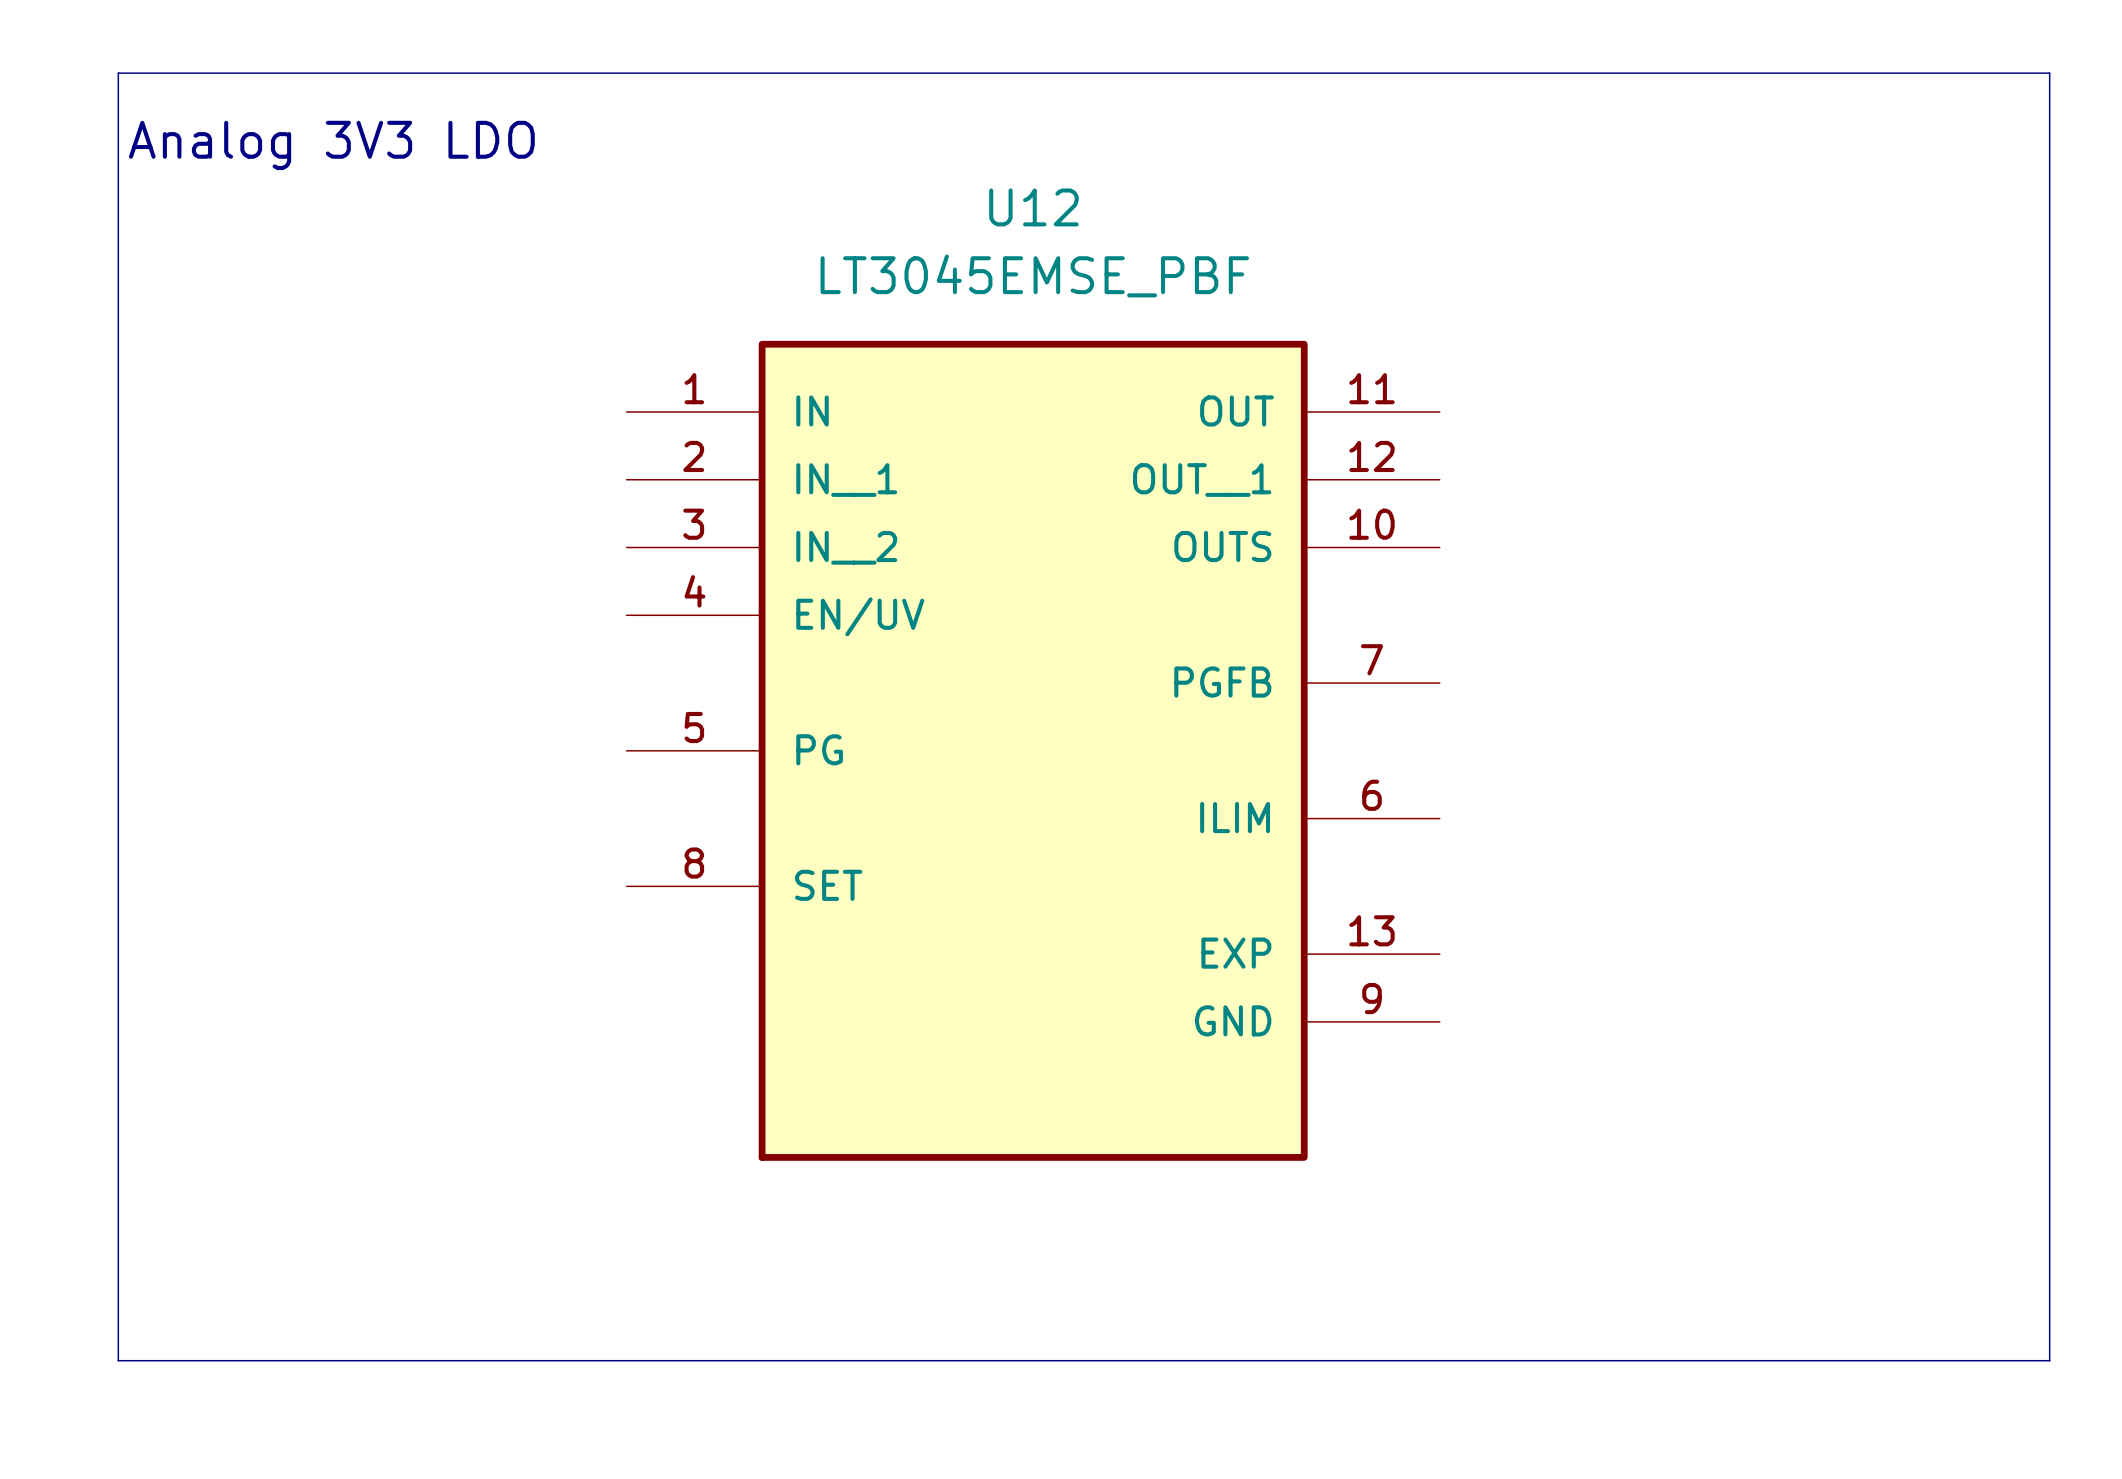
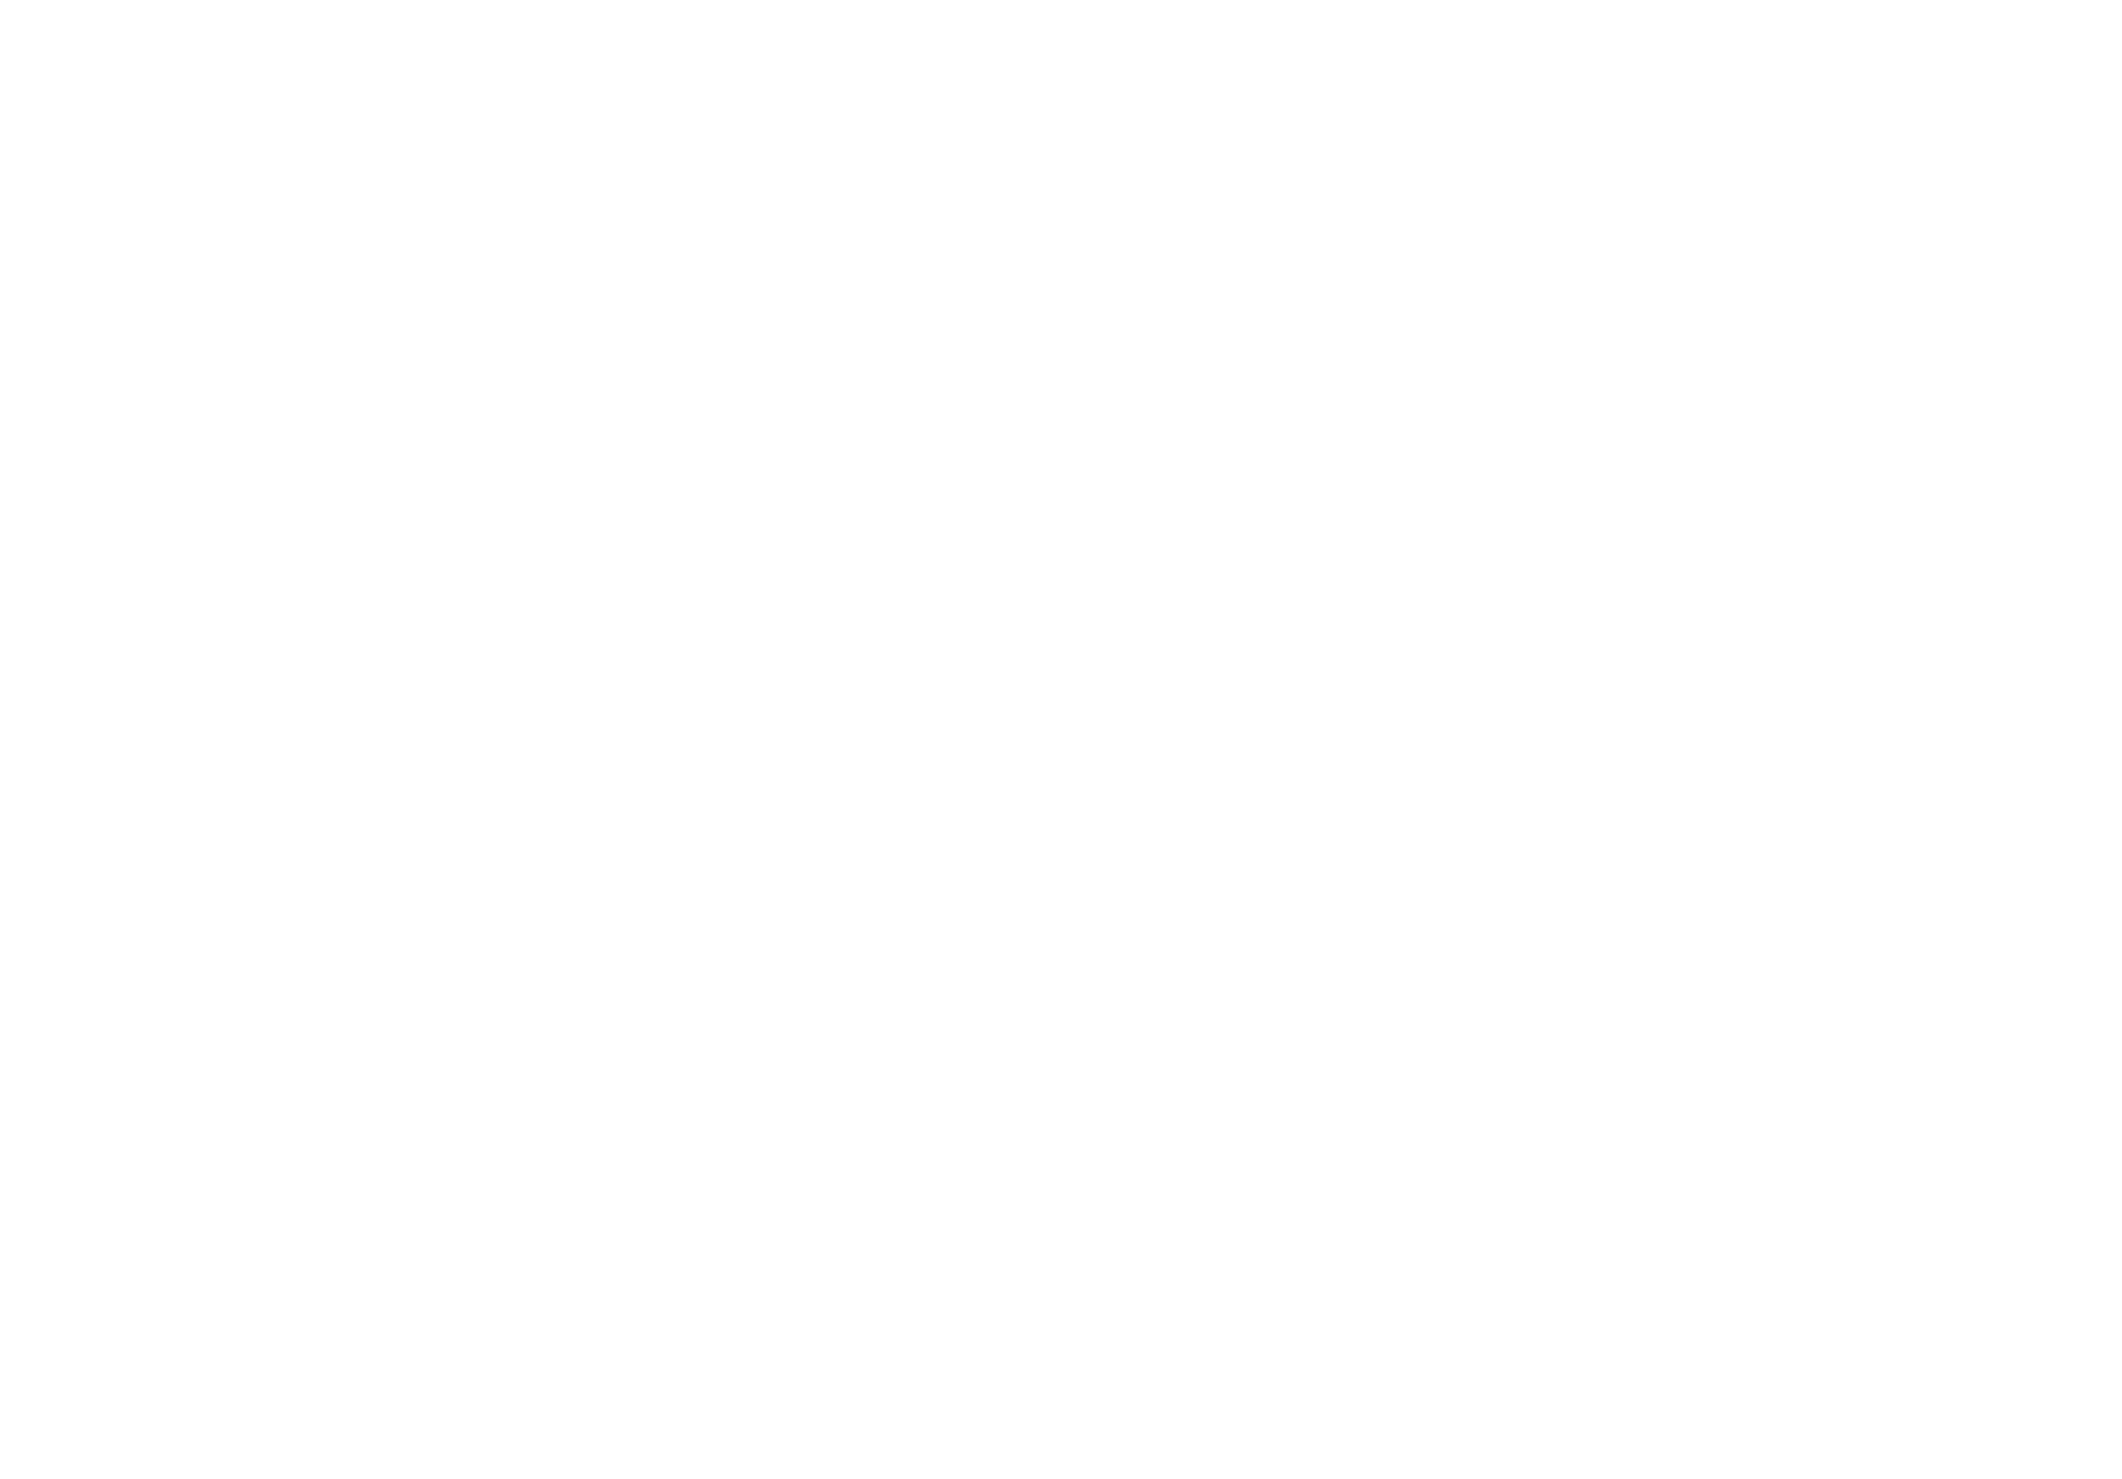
line: (118, 73) (2049, 73) (2049, 1360) (118, 1360) (118, 73) -> none
text: Analog 3V3 LDO (331, 145) -> none
U12: LT3045EMSE_PBF (1033, 750) -> none

